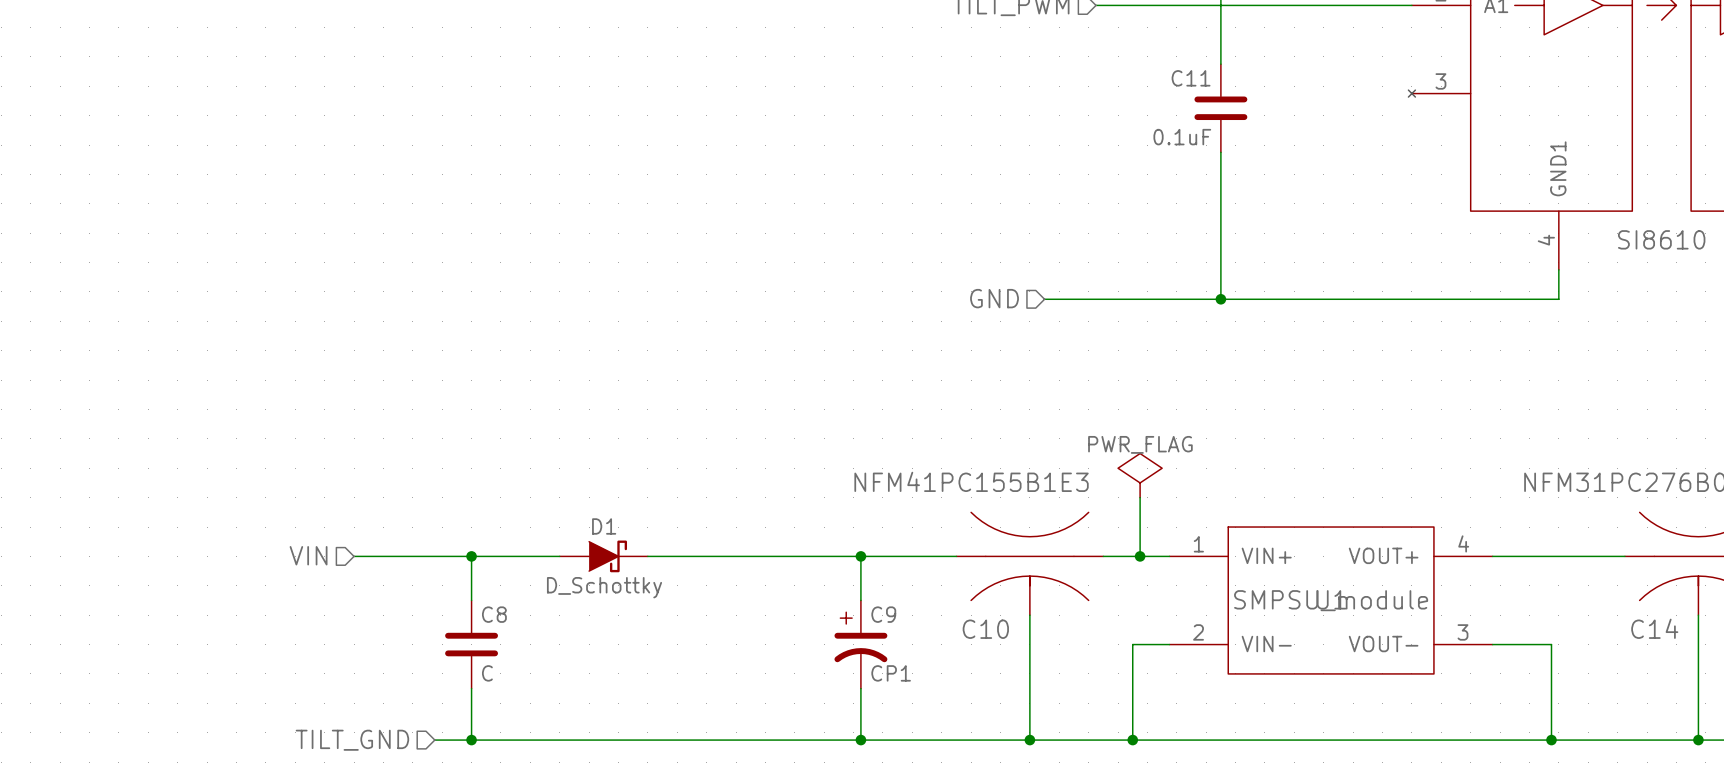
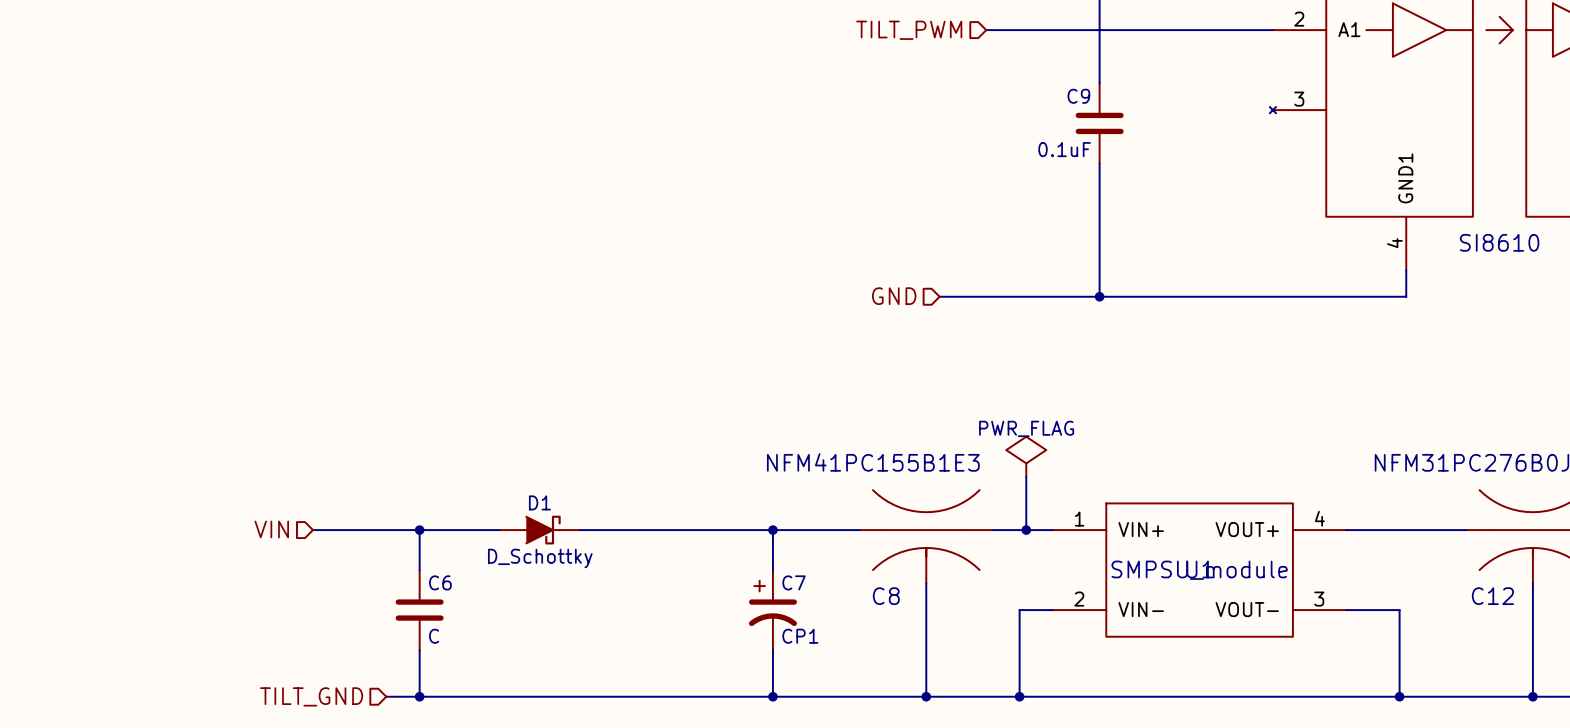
C11 name: C11 (1191, 78) -> C9 (1078, 96)
C8 name: C8 (494, 614) -> C6 (440, 582)
C9 name: C9 (883, 614) -> C7 (794, 582)
C14 name: C14 (1654, 628) -> C12 (1492, 596)
C10 name: C10 (985, 629) -> C8 (886, 596)

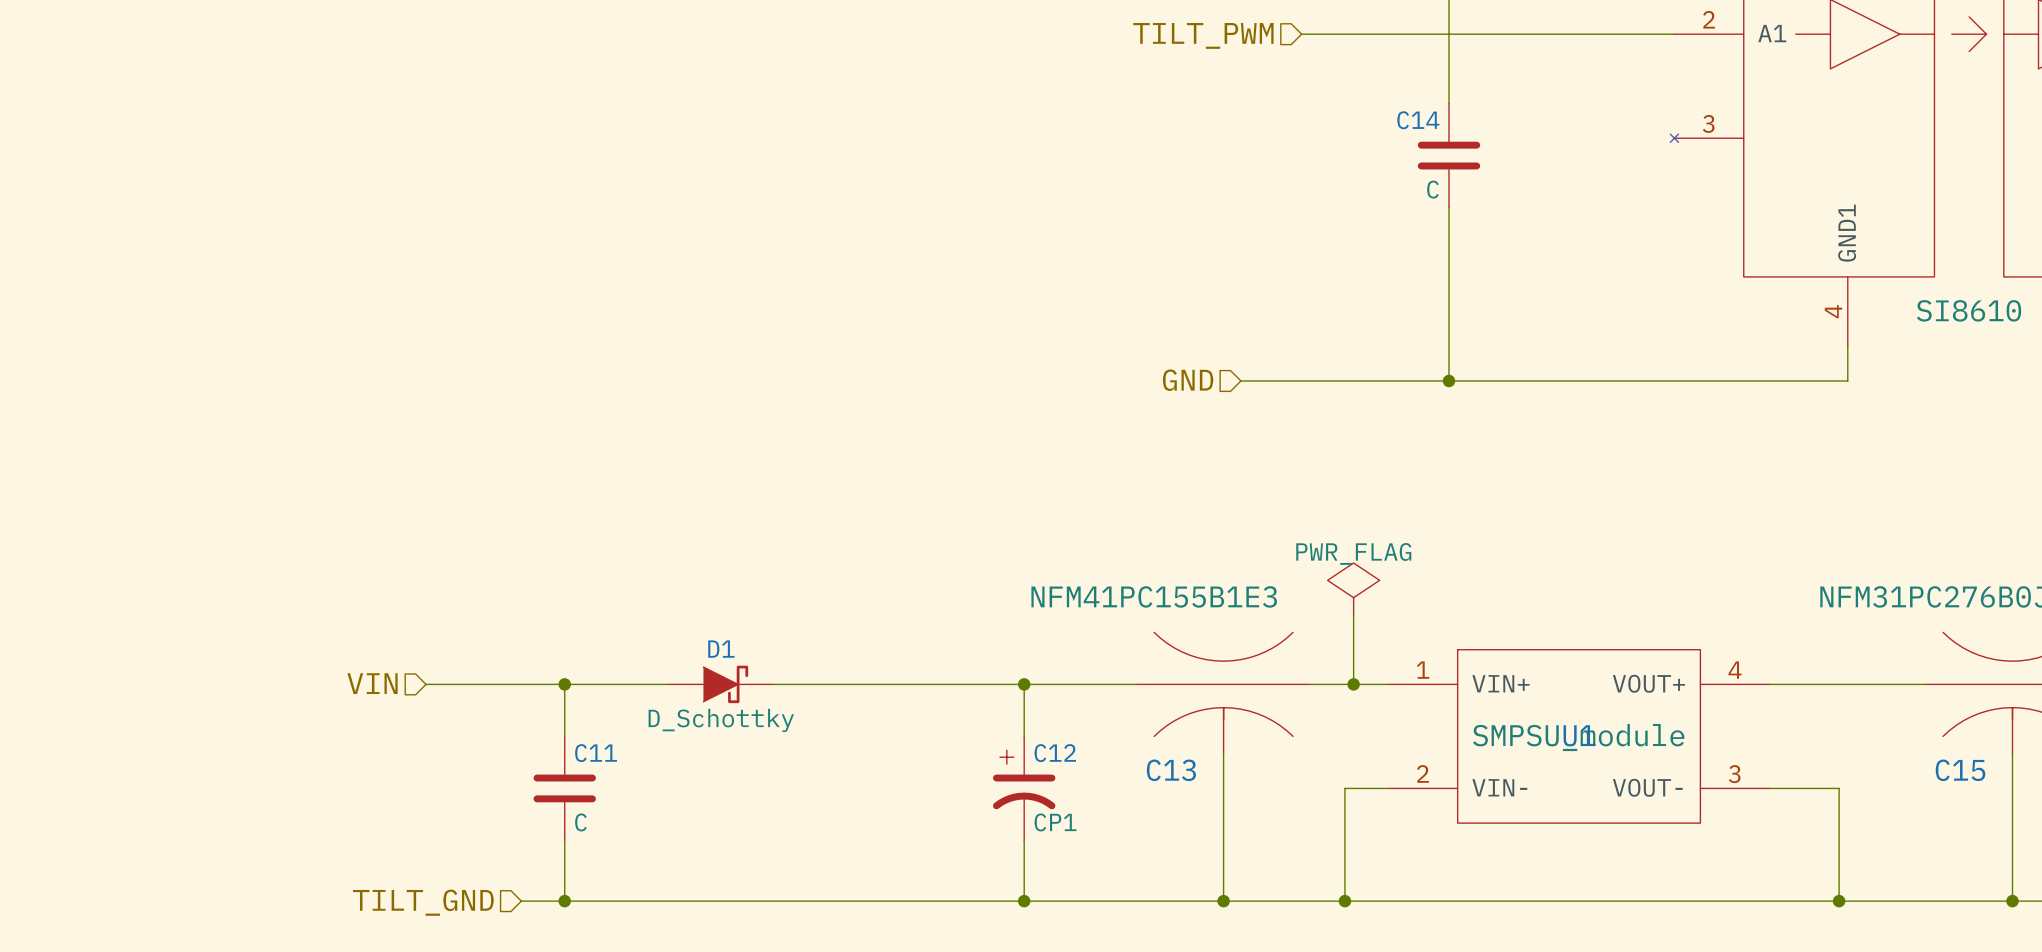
C9 name: C9 (1078, 96) -> C14 (1418, 120)
C9 value: 0.1uF (1064, 149) -> C (1432, 189)
C6 name: C6 (440, 582) -> C11 (596, 753)
C7 name: C7 (794, 582) -> C12 (1055, 753)
C8 name: C8 (886, 596) -> C13 (1171, 770)
C12 name: C12 (1492, 596) -> C15 (1960, 770)

